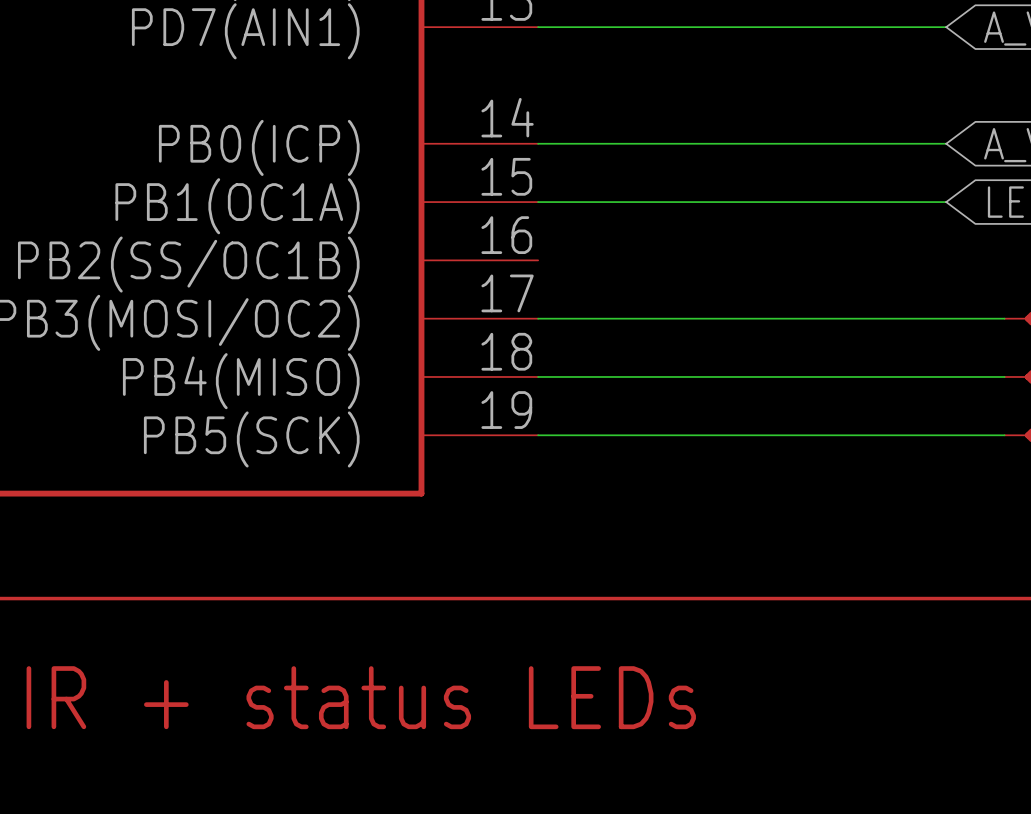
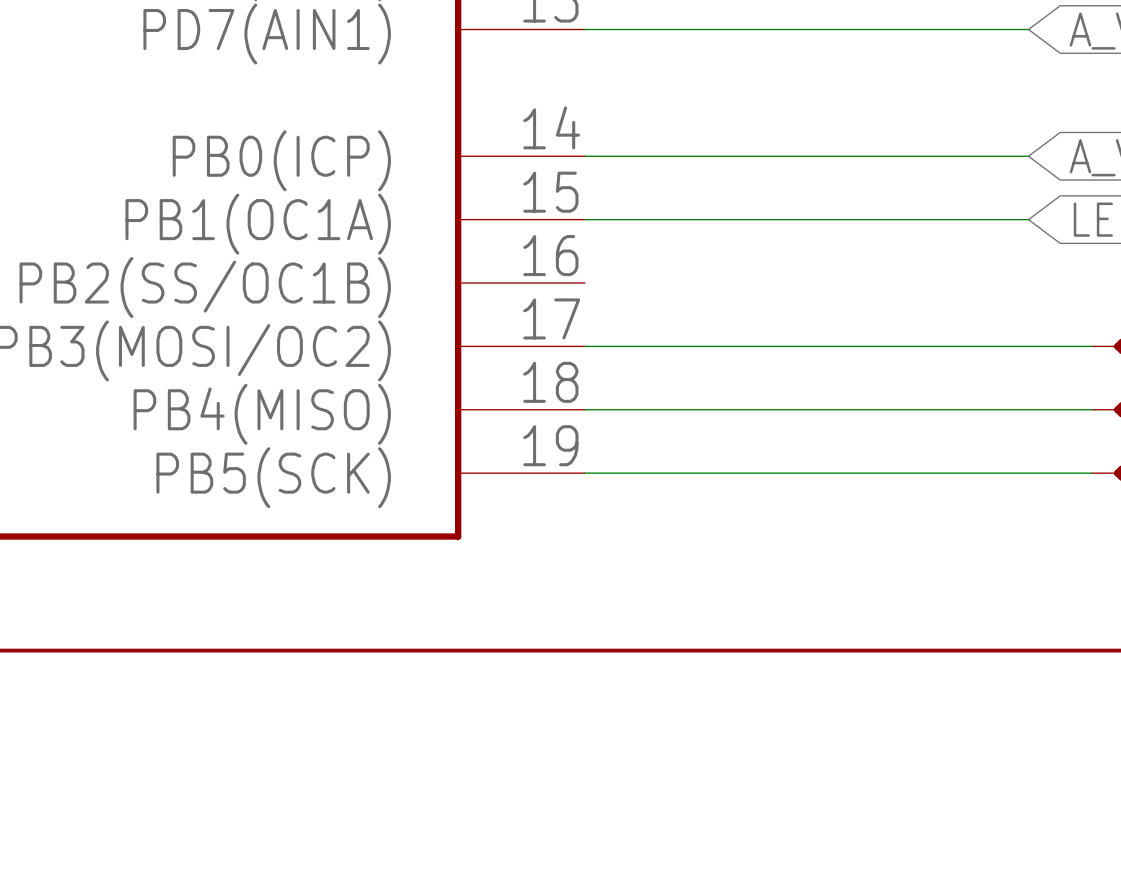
text: IR + status LEDs (361, 697) -> none

